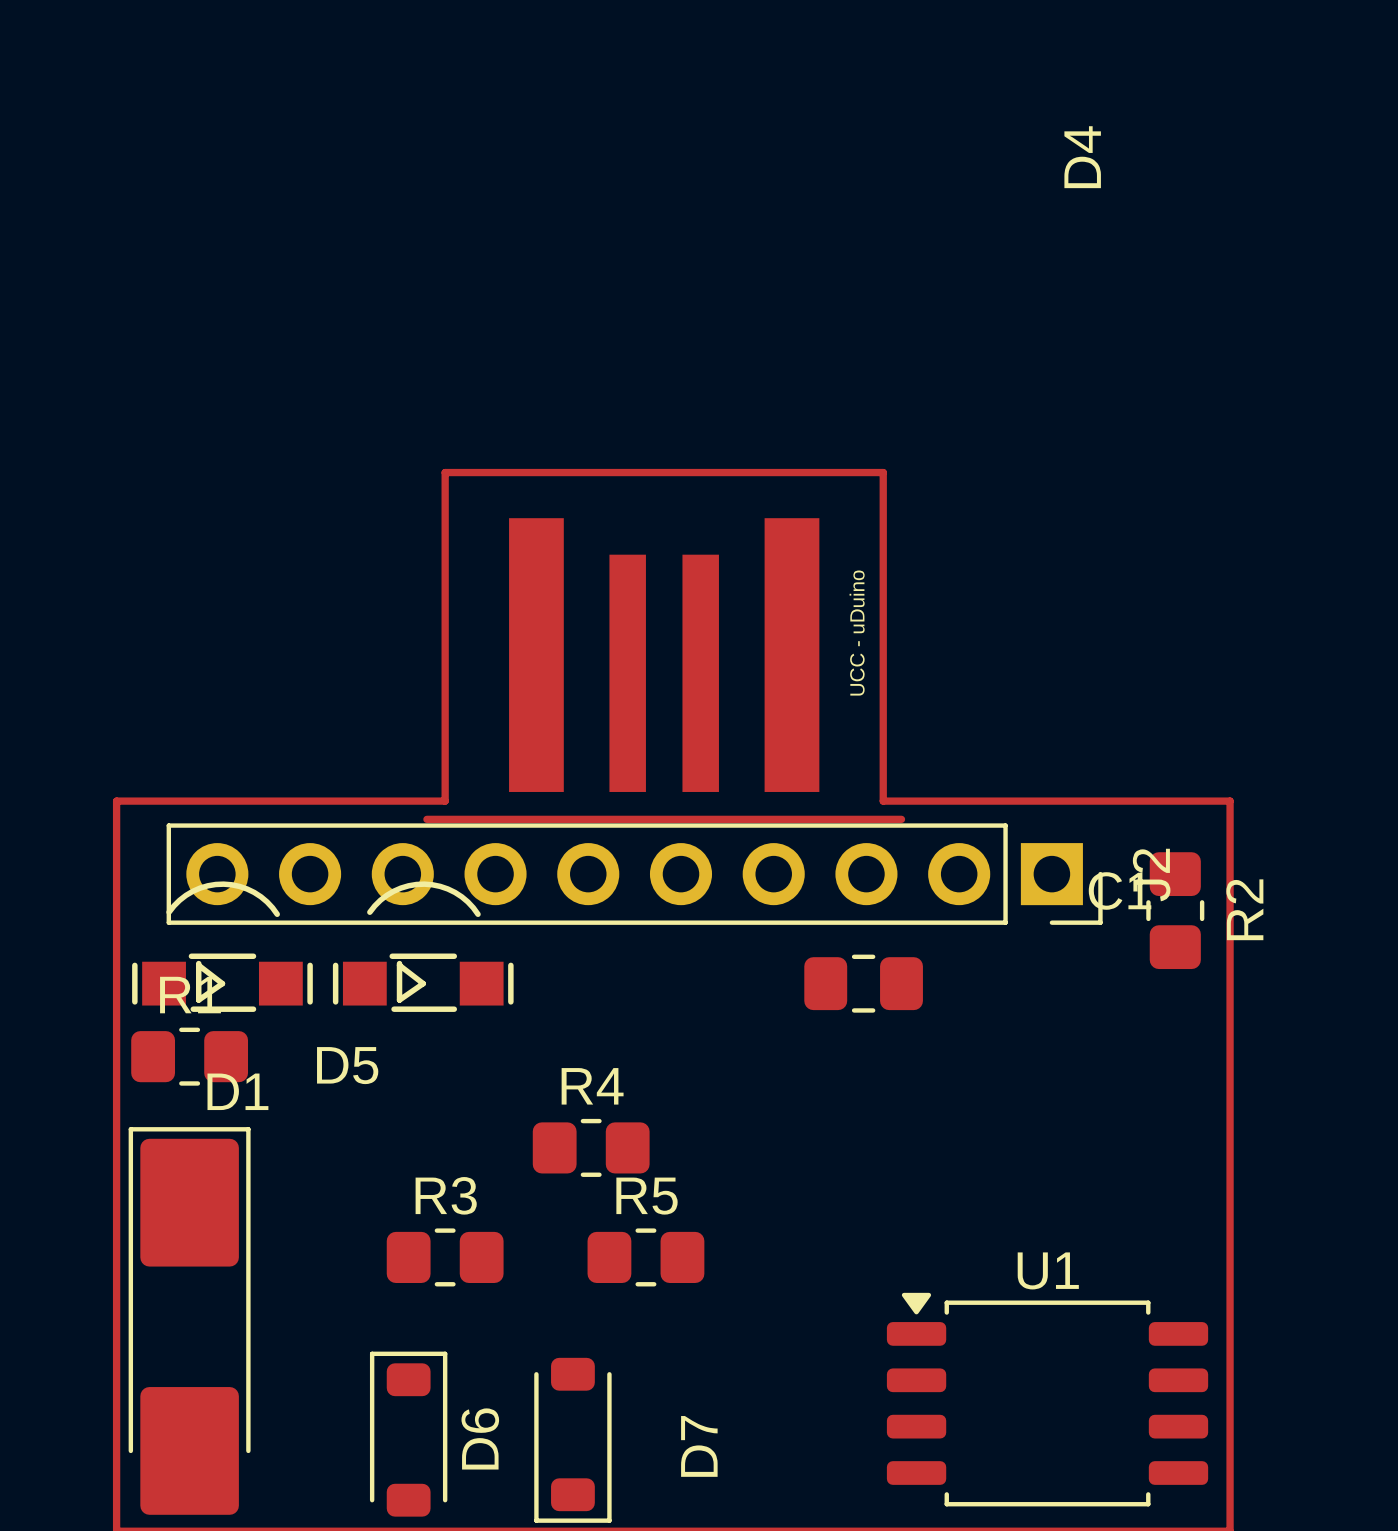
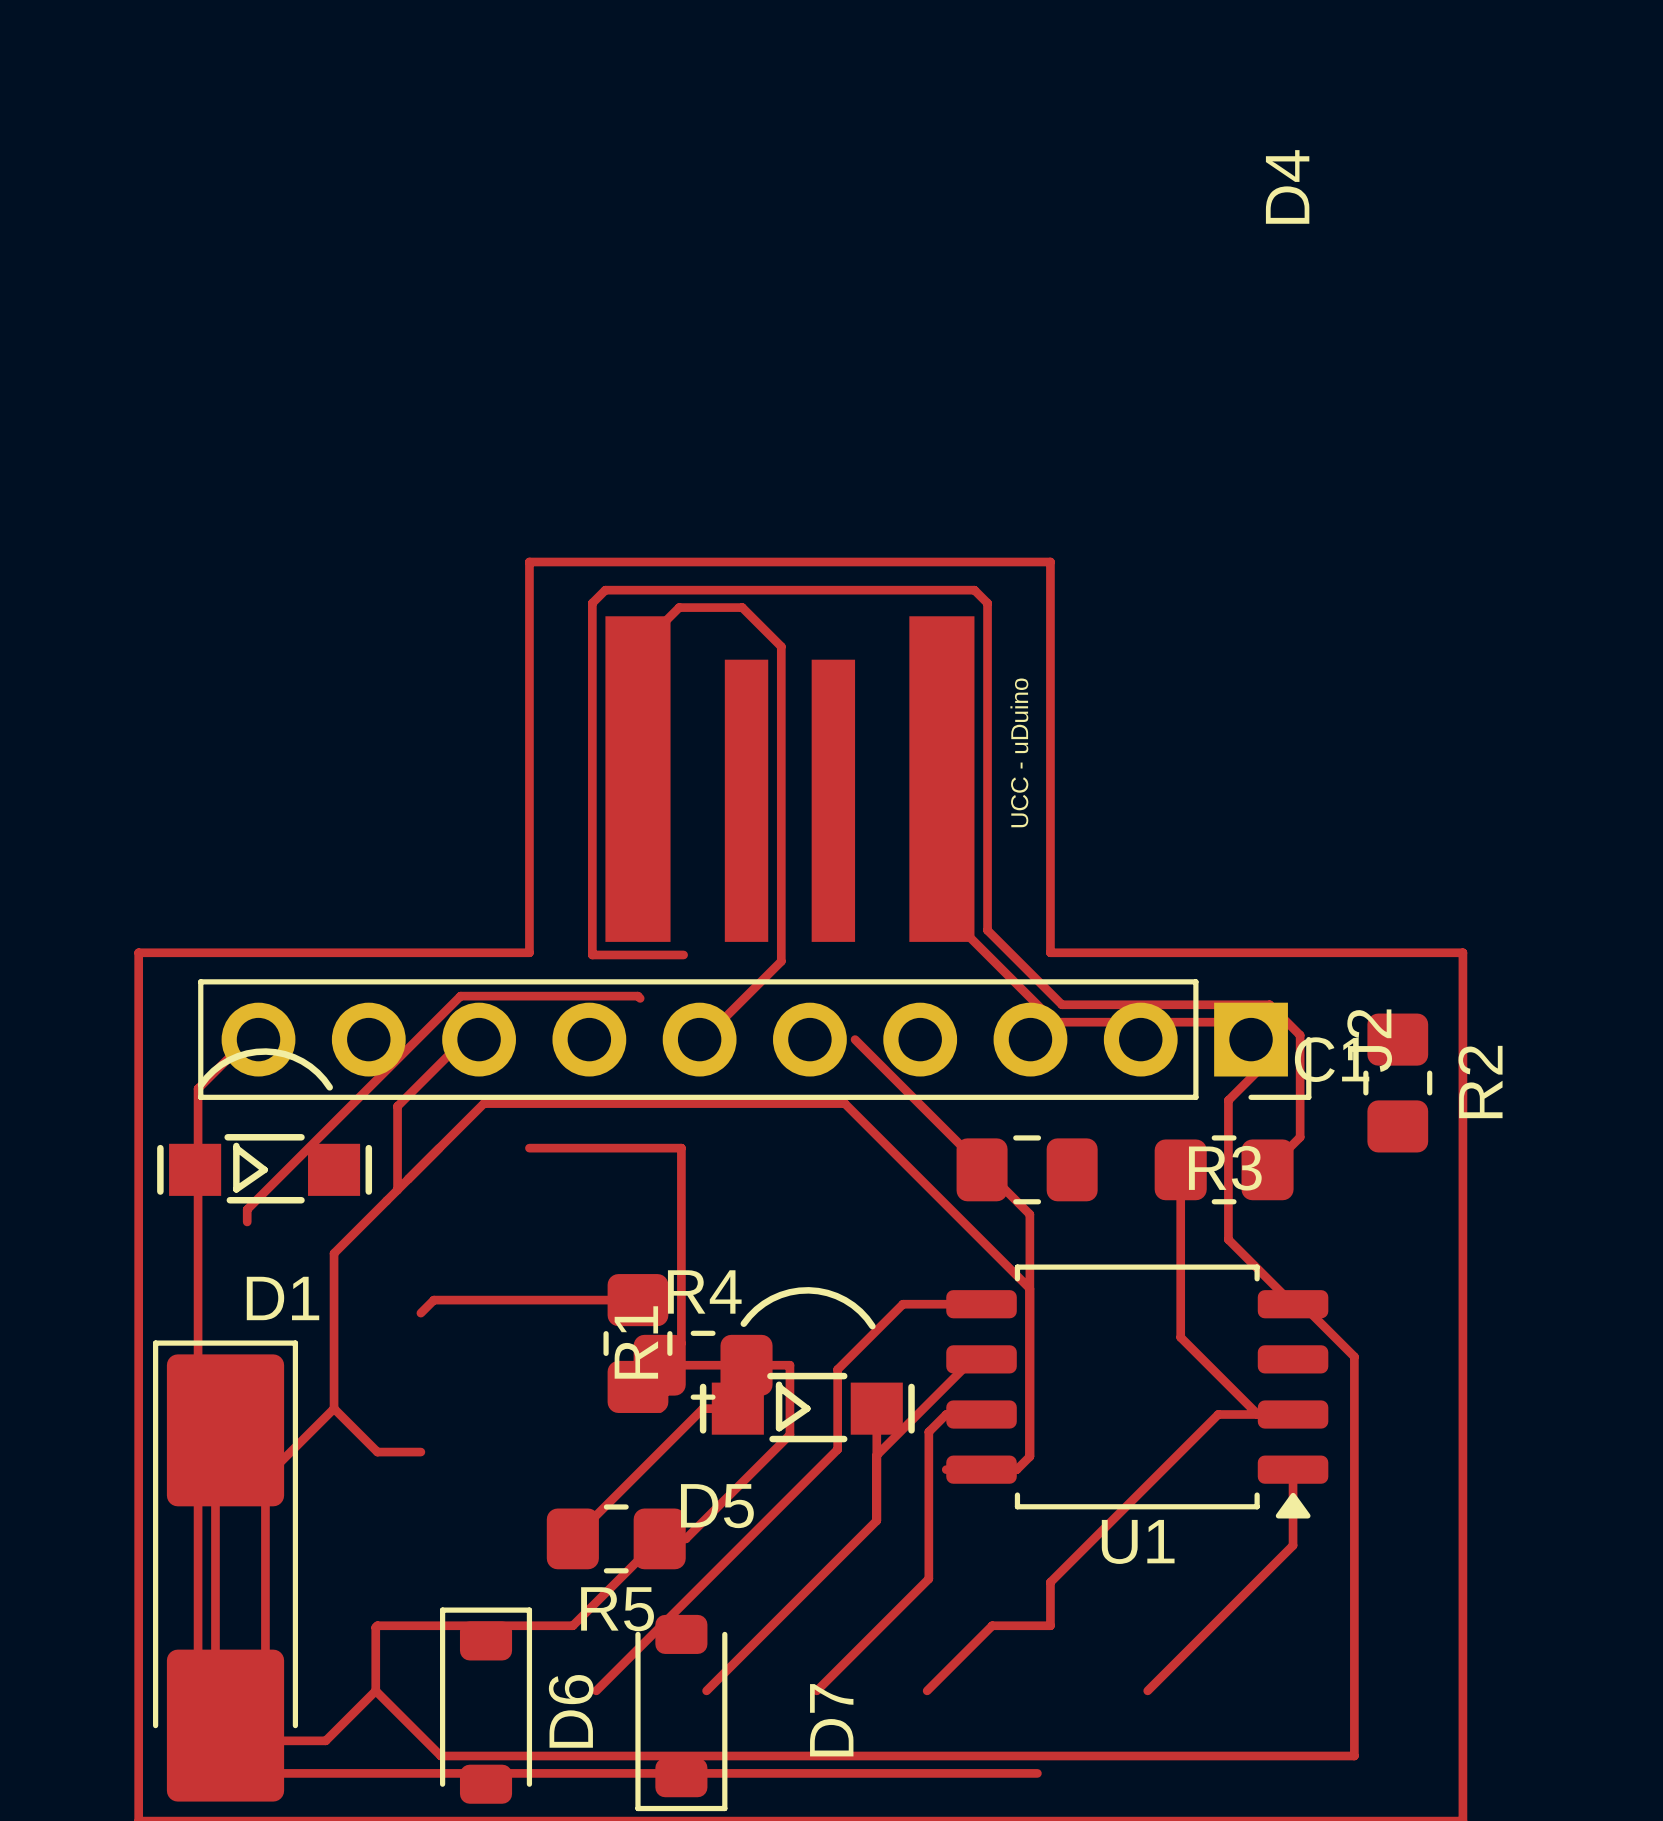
track: none -> (637, 779) (637, 648) (679, 607) (742, 607) (781, 646) (781, 961) (703, 1039)
track: none -> (941, 779) (941, 909) (1054, 1022) (1228, 1022) (1267, 1061) (1228, 1100) (1228, 1239) (1293, 1304) (1301, 1304) (1354, 1356) (1354, 1755) (440, 1755) (375, 1690)
track: none -> (683, 954) (592, 954) (592, 603) (605, 590) (974, 590) (987, 603) (987, 930) (1061, 1004) (1269, 1004) (1300, 1035) (1300, 1137) (1267, 1169)
track: (426, 819) (901, 819) -> none
track: none -> (640, 998) (637, 996) (460, 996) (247, 1209) (247, 1221)
track: none -> (247, 1039) (198, 1088) (198, 1748) (223, 1773) (1037, 1773)
track: none -> (486, 1039) (464, 1039) (397, 1106) (397, 1189)
track: none -> (855, 1039) (1029, 1214) (1029, 1456) (1016, 1469) (946, 1469)
D5 position: (423, 946) -> (807, 1364)
track: none -> (529, 1148) (681, 1148) (681, 1343) (637, 1386) (659, 1408)
track: none -> (1180, 1169) (1180, 1337) (1257, 1414)
R1 rotation: 0° (189, 1056) -> 90° clockwise (637, 1343)
R1 position: (189, 1056) -> (637, 1343)
track: none -> (1029, 1288) (844, 1103) (483, 1103) (334, 1253) (334, 1408)
track: none -> (637, 1300) (433, 1300) (420, 1313)
track: none -> (981, 1304) (902, 1304) (837, 1369) (837, 1449) (596, 1690)
track: none -> (981, 1359) (972, 1359) (876, 1455)
track: none -> (247, 1365) (215, 1396) (215, 1740) (325, 1740) (375, 1690)
track: none -> (659, 1365) (789, 1365) (789, 1434) (685, 1538) (659, 1538) (572, 1625) (377, 1625) (375, 1627) (375, 1690)
track: none -> (334, 1408) (265, 1477) (265, 1690)
track: none -> (334, 1408) (377, 1452) (420, 1452)
track: none -> (737, 1408) (703, 1408) (572, 1538)
track: none -> (876, 1408) (876, 1520) (706, 1690)
track: none -> (981, 1414) (946, 1414) (928, 1431) (928, 1578) (816, 1690)
track: none -> (1293, 1414) (1218, 1414) (1050, 1582) (1050, 1625) (992, 1625) (927, 1690)
R3 name position: R3 (446, 1195) -> R3 (1225, 1168)
R5 name position: R5 (647, 1196) -> R5 (617, 1609)
track: none -> (1293, 1469) (1293, 1545) (1147, 1690)
R3 position: (445, 1257) -> (1224, 1169)
R5 position: (645, 1257) -> (616, 1538)
U1 rotation: 0° (1047, 1399) -> 180° (1137, 1391)
U1 position: (1047, 1399) -> (1137, 1391)

